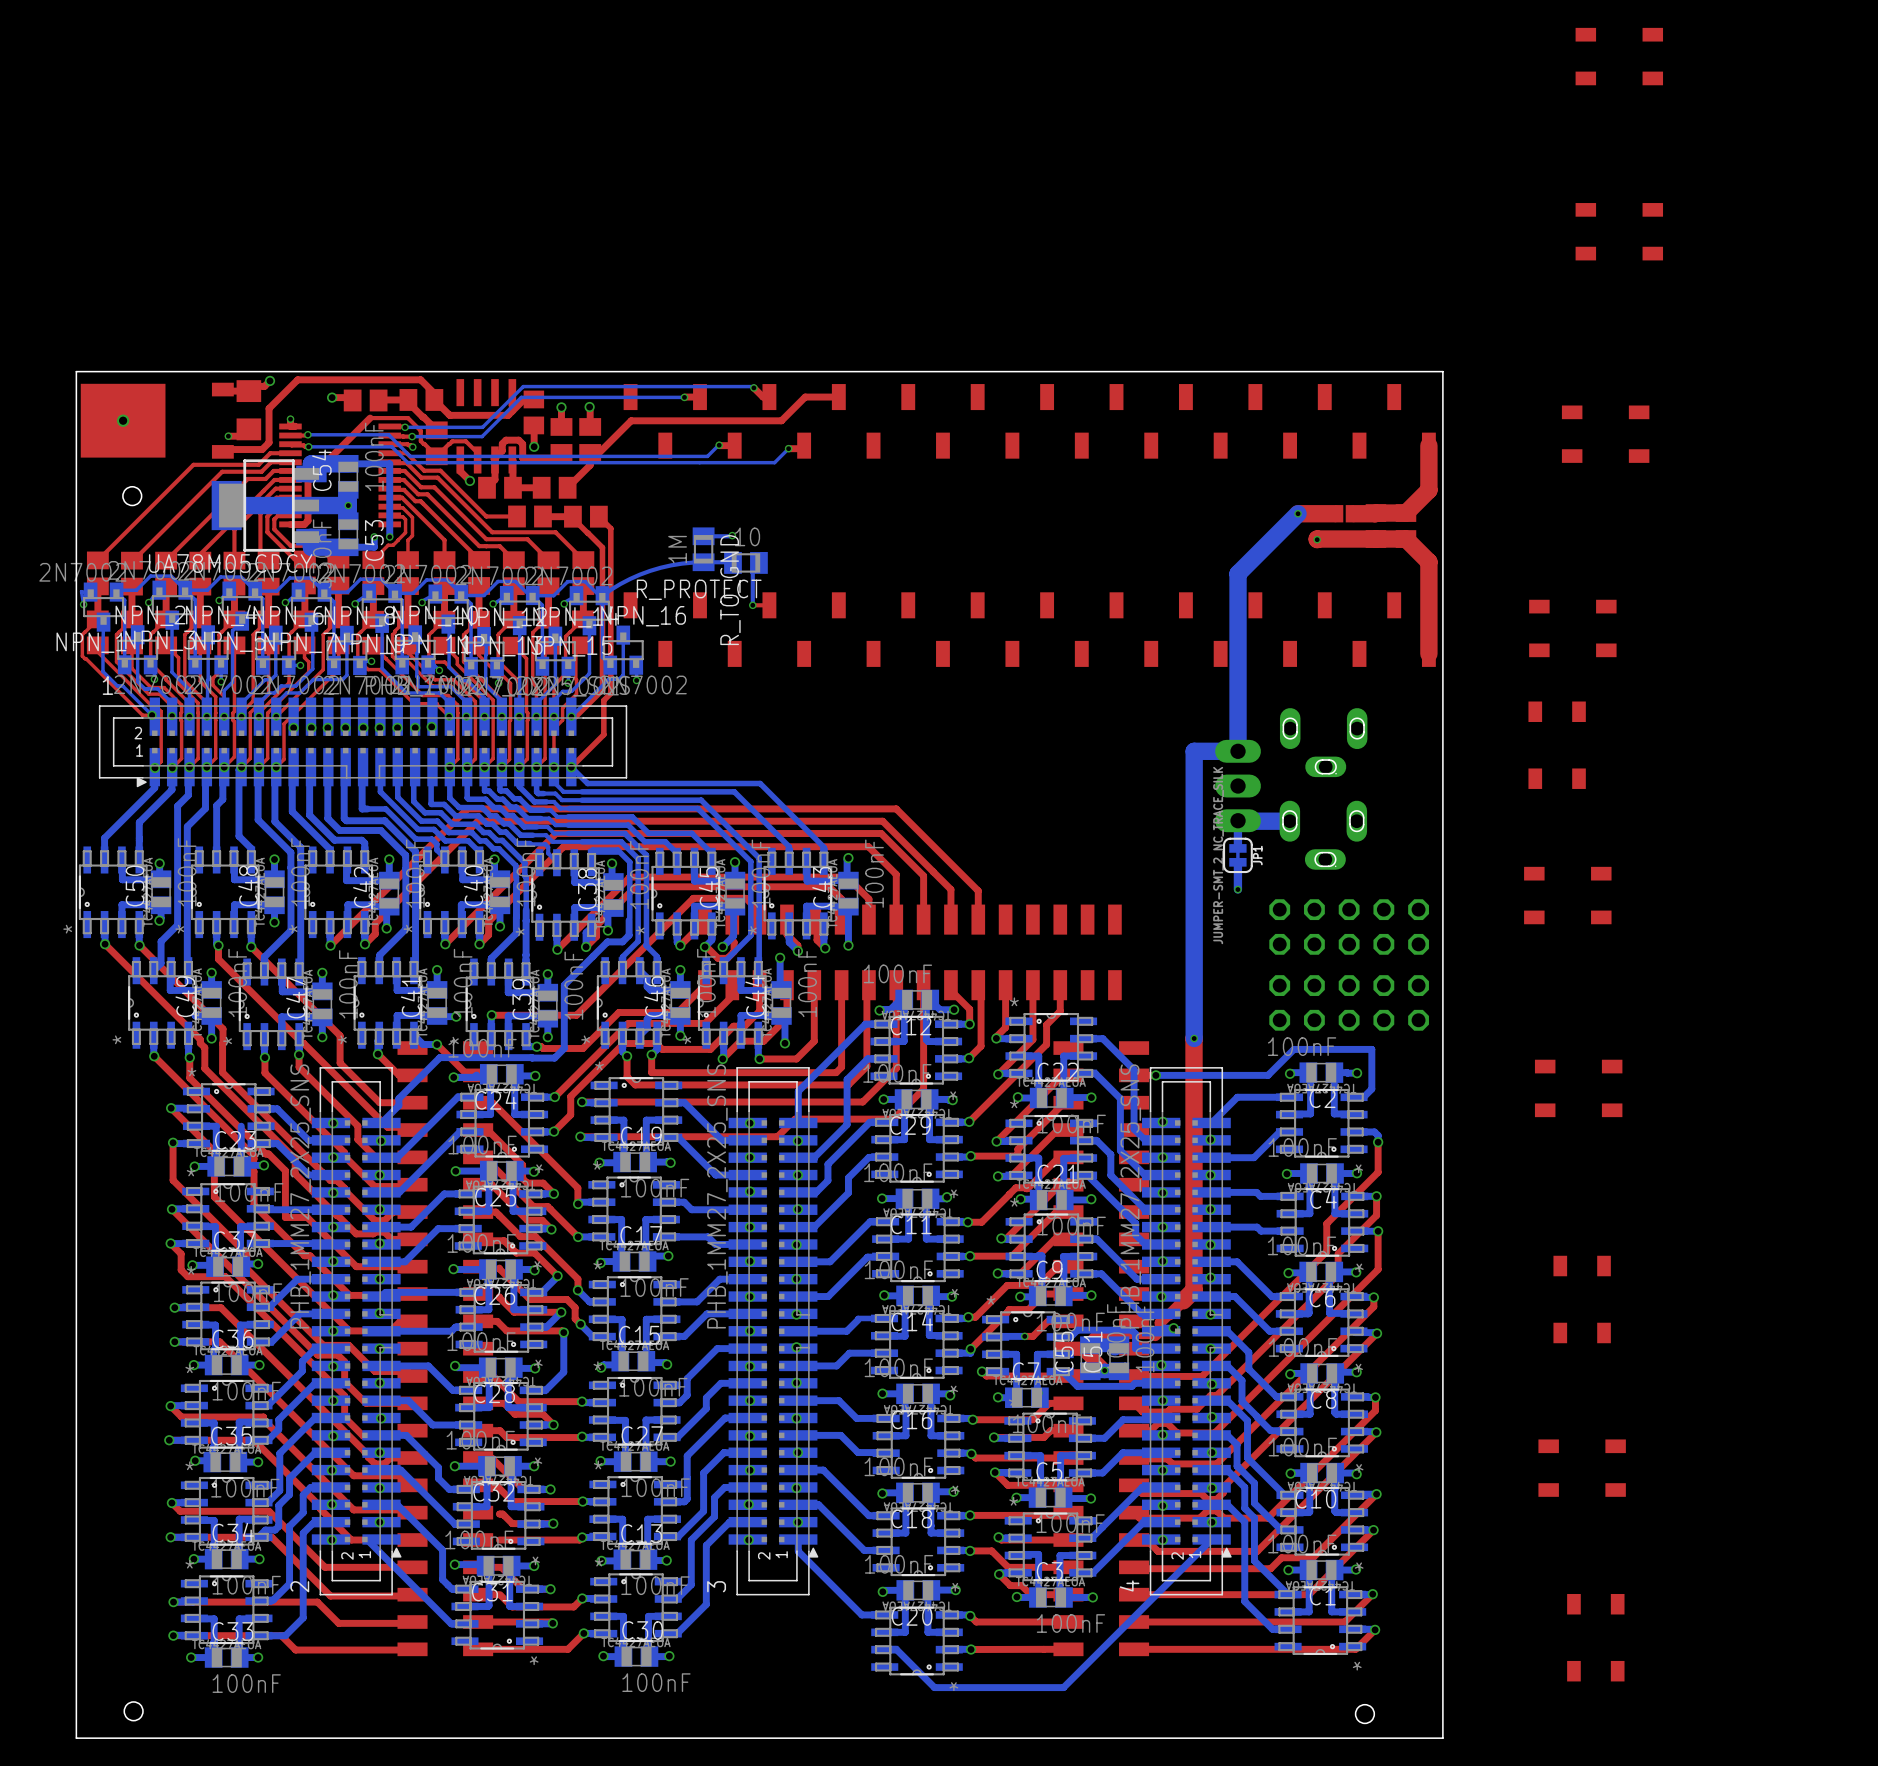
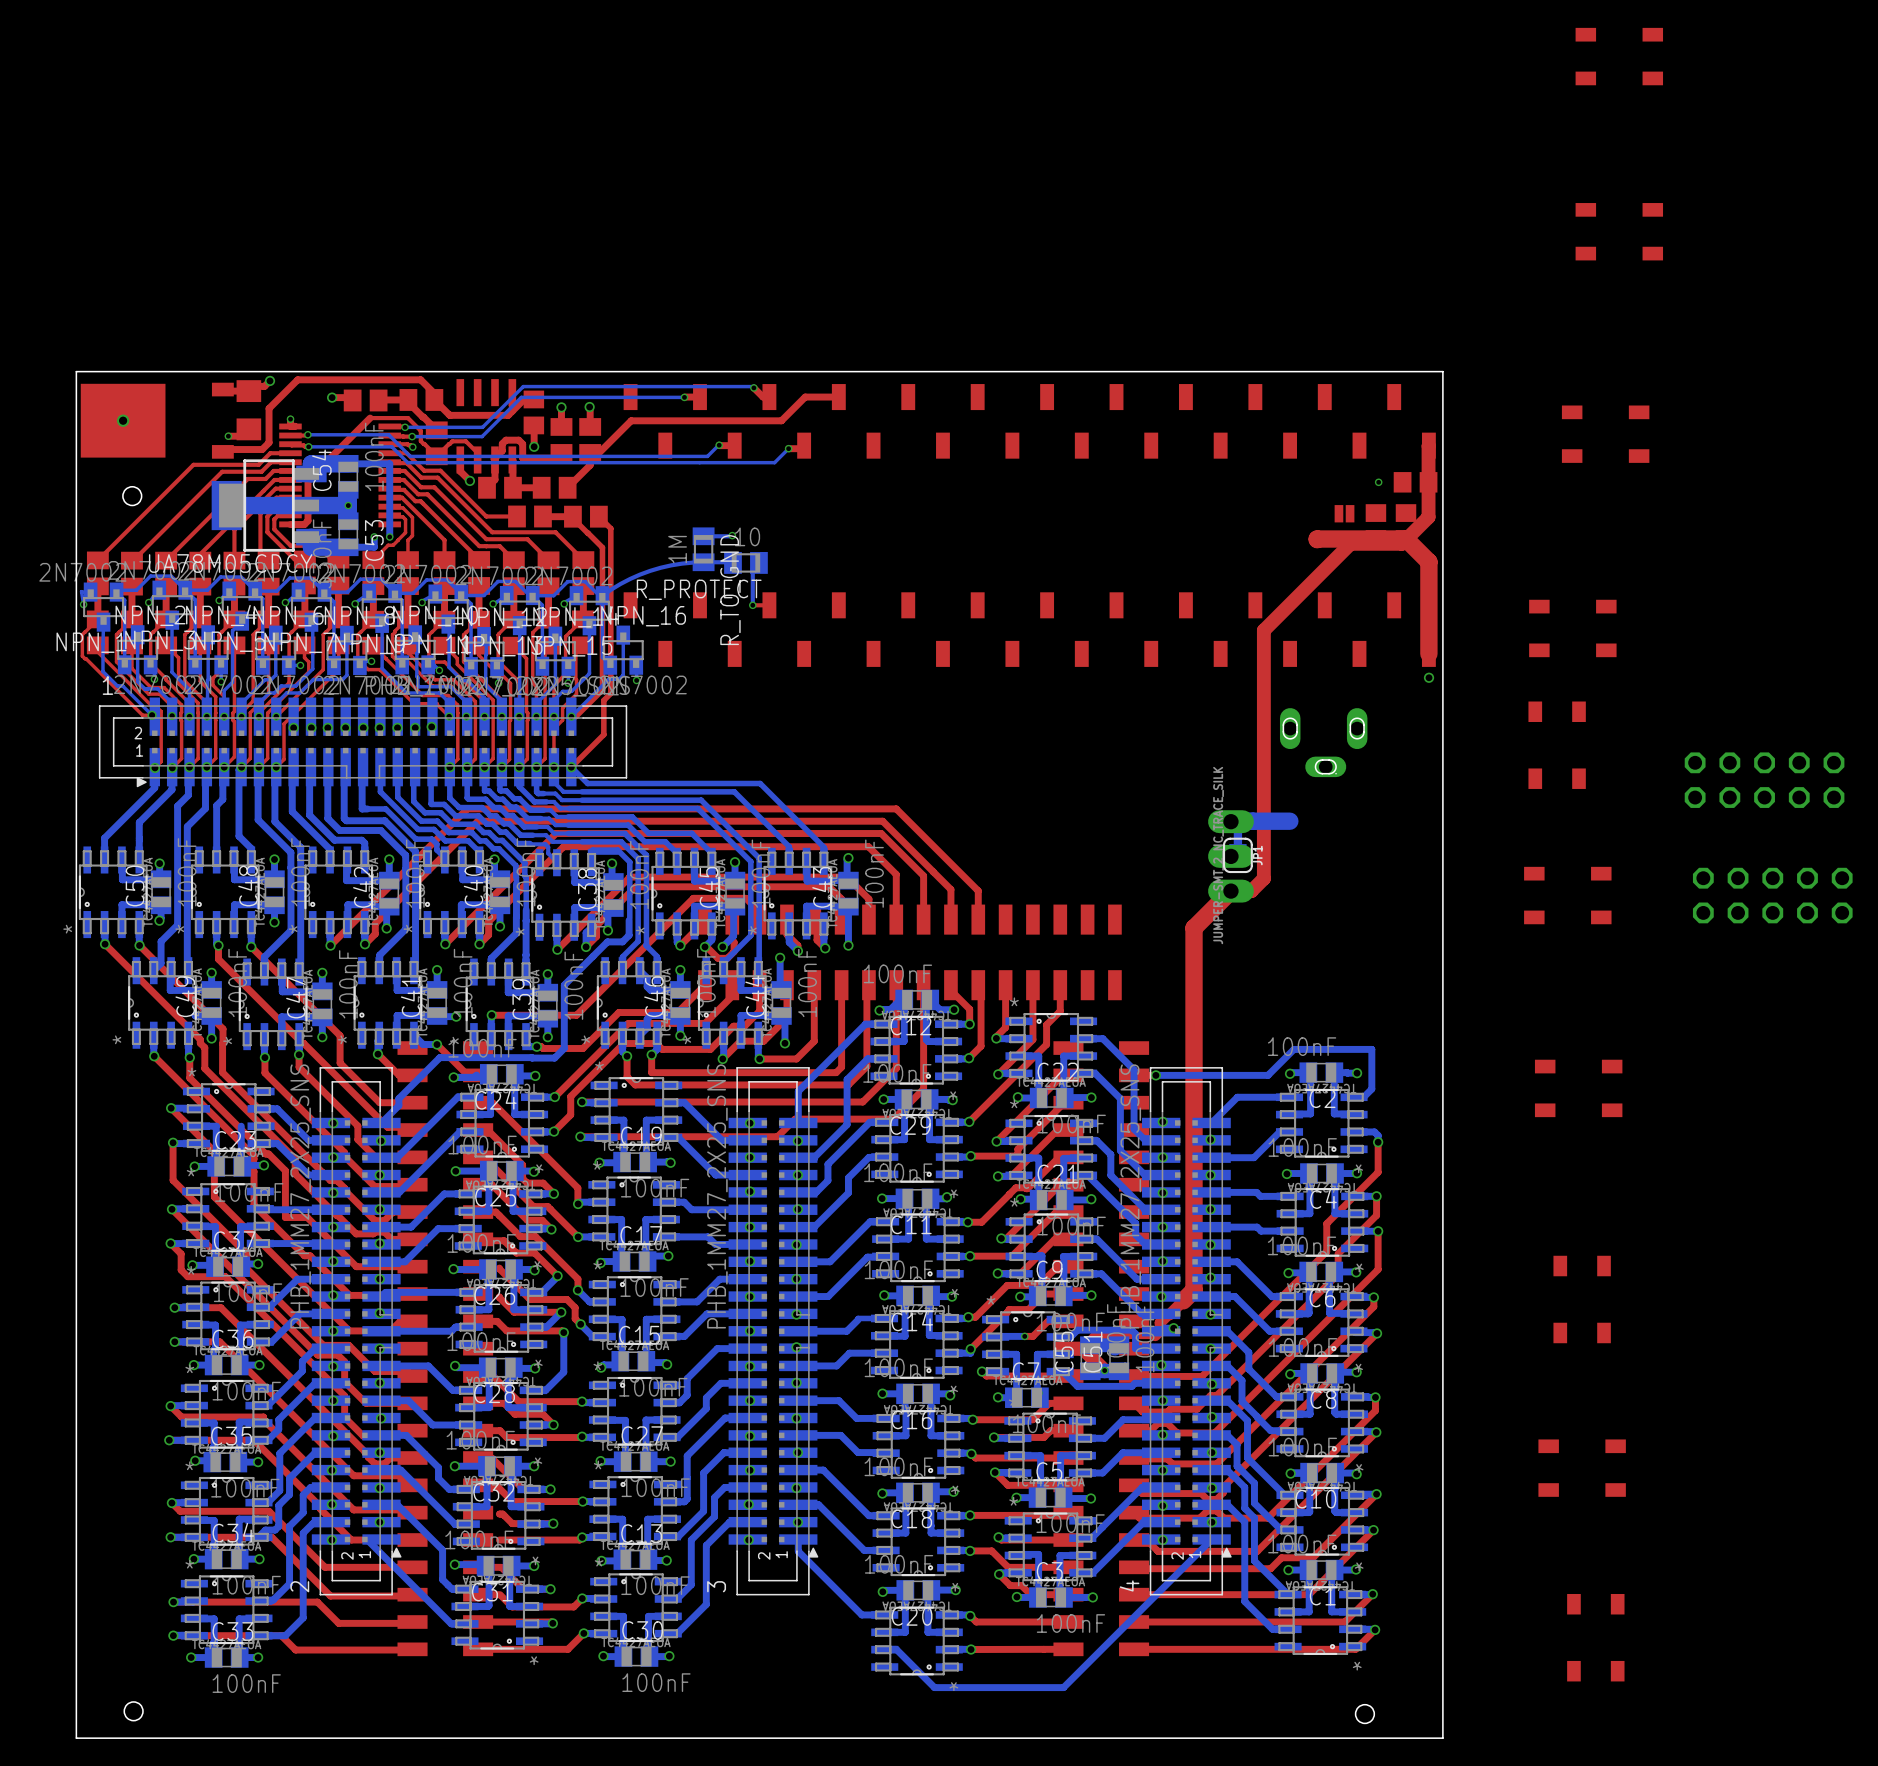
top track: (1428, 445) (1428, 490) (1406, 513) (1354, 513) -> (1428, 446) (1428, 517) (1401, 543) (1350, 543) (1263, 630) (1263, 878) (1251, 891) (1230, 891) (1194, 928) (1194, 1038)
via: none -> (1378, 482)
part: none -> (1415, 482)
bottom track: (1298, 513) (1238, 573) (1238, 751) (1194, 751) (1194, 1038) -> none
via: (1298, 513) -> none
top track: (1334, 513) (1298, 513) -> none
via: (1317, 539) -> none
via: none -> (1429, 677)
part: none -> (1764, 780)
part position: (1238, 786) -> (1230, 856)
part: (1323, 835) -> none
bottom track: (1237, 862) (1237, 889) -> none
via: (1237, 889) -> none
part: none -> (1772, 895)
part: (1349, 926) -> none
part: (1349, 1002) -> none
via: (1194, 1038) -> none

